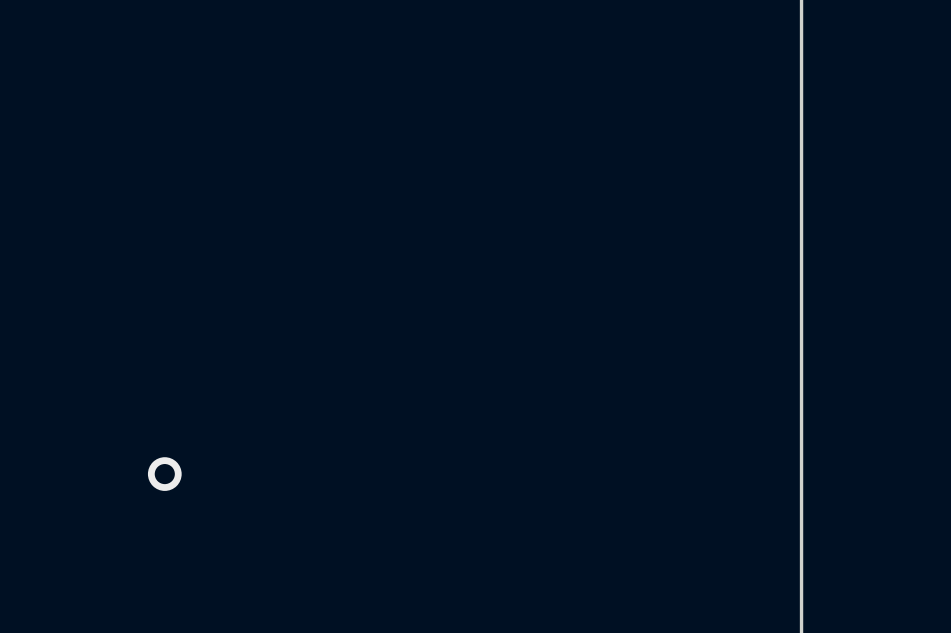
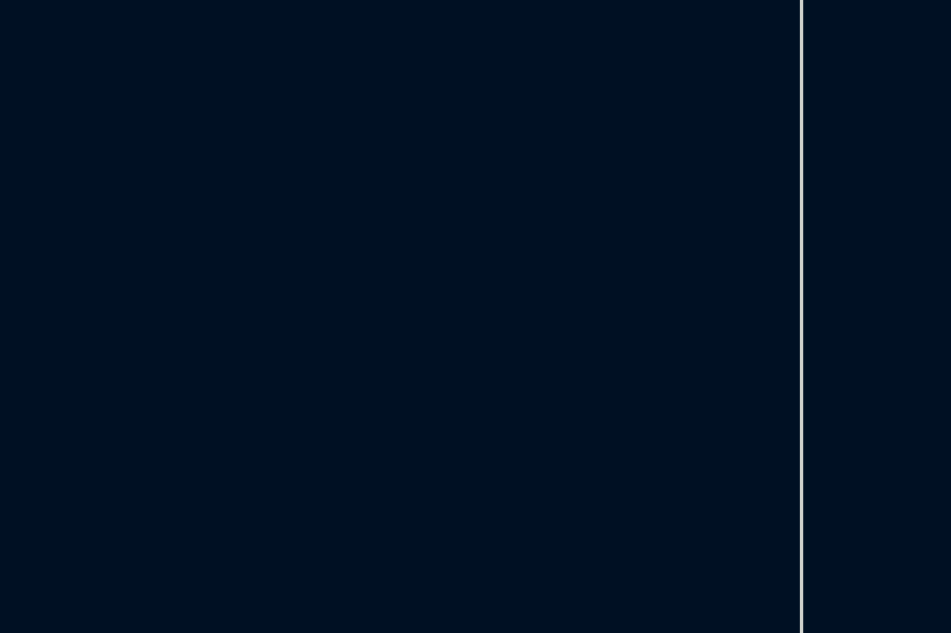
via: (164, 474) -> none

